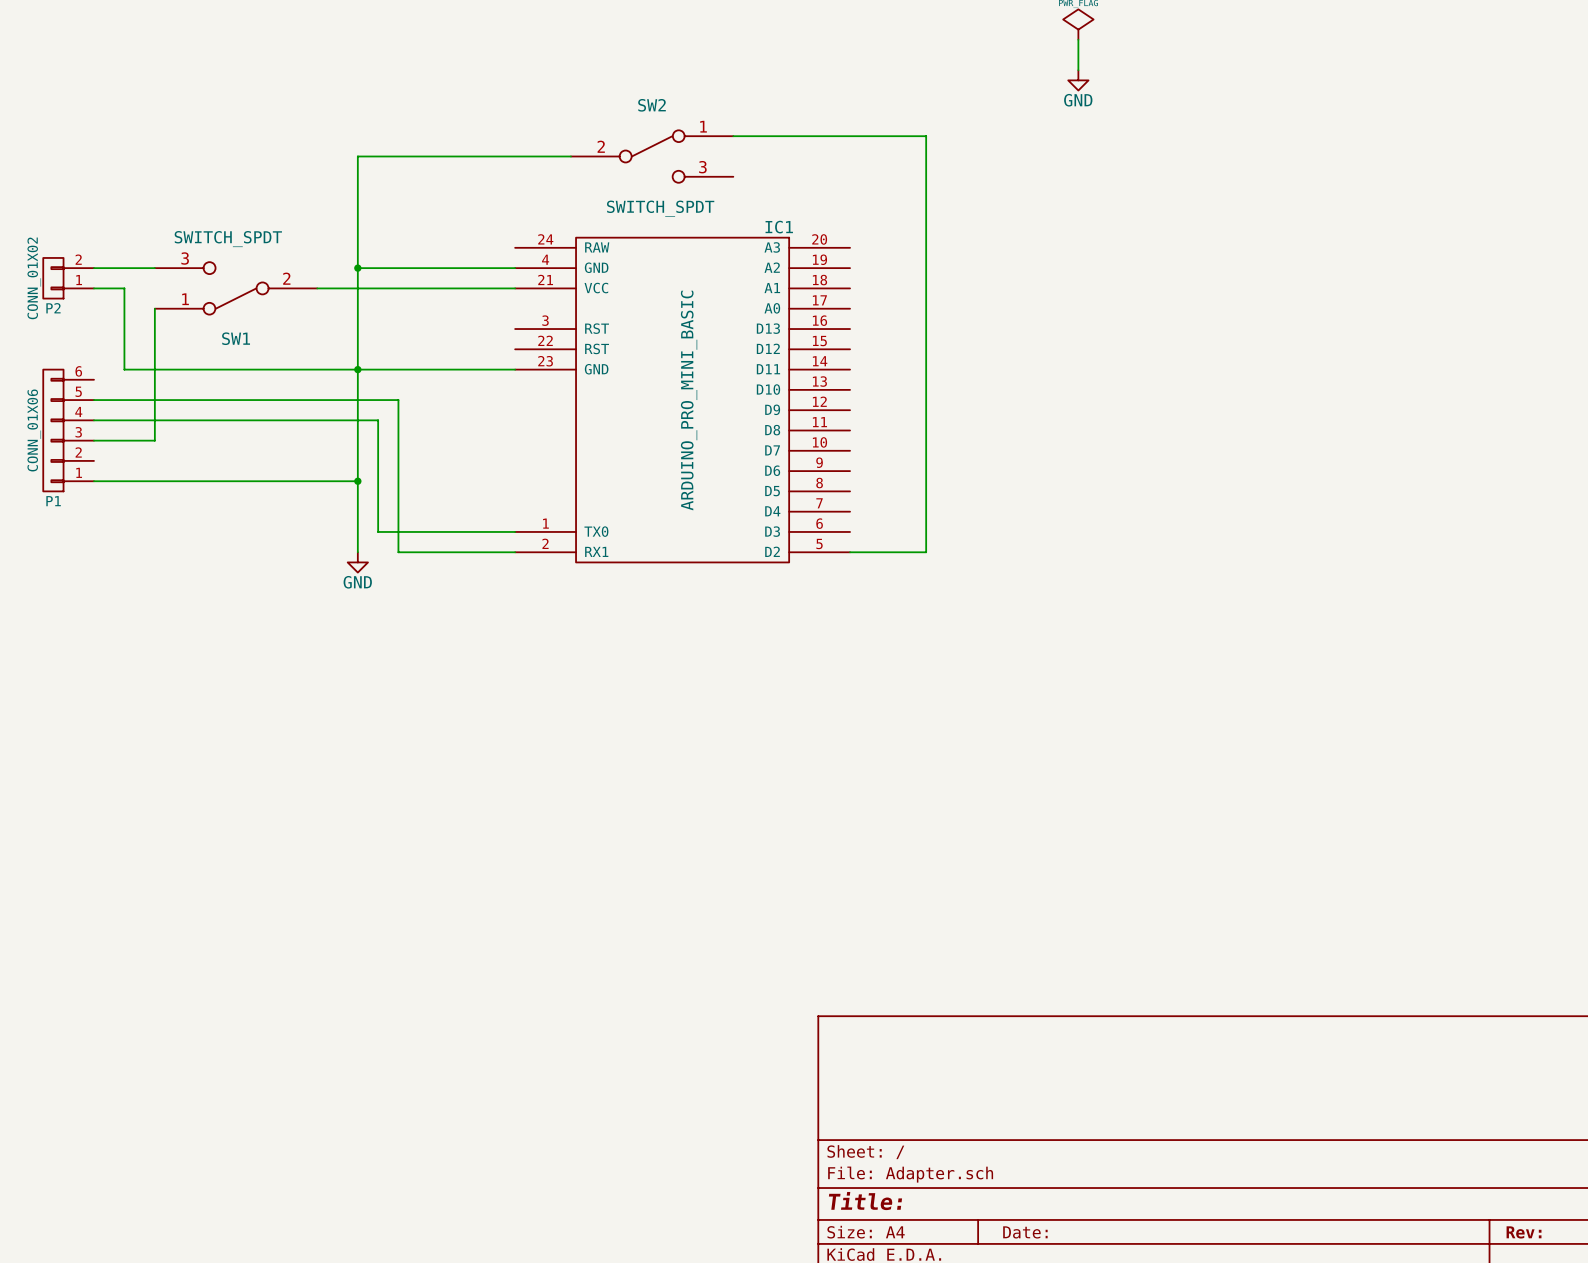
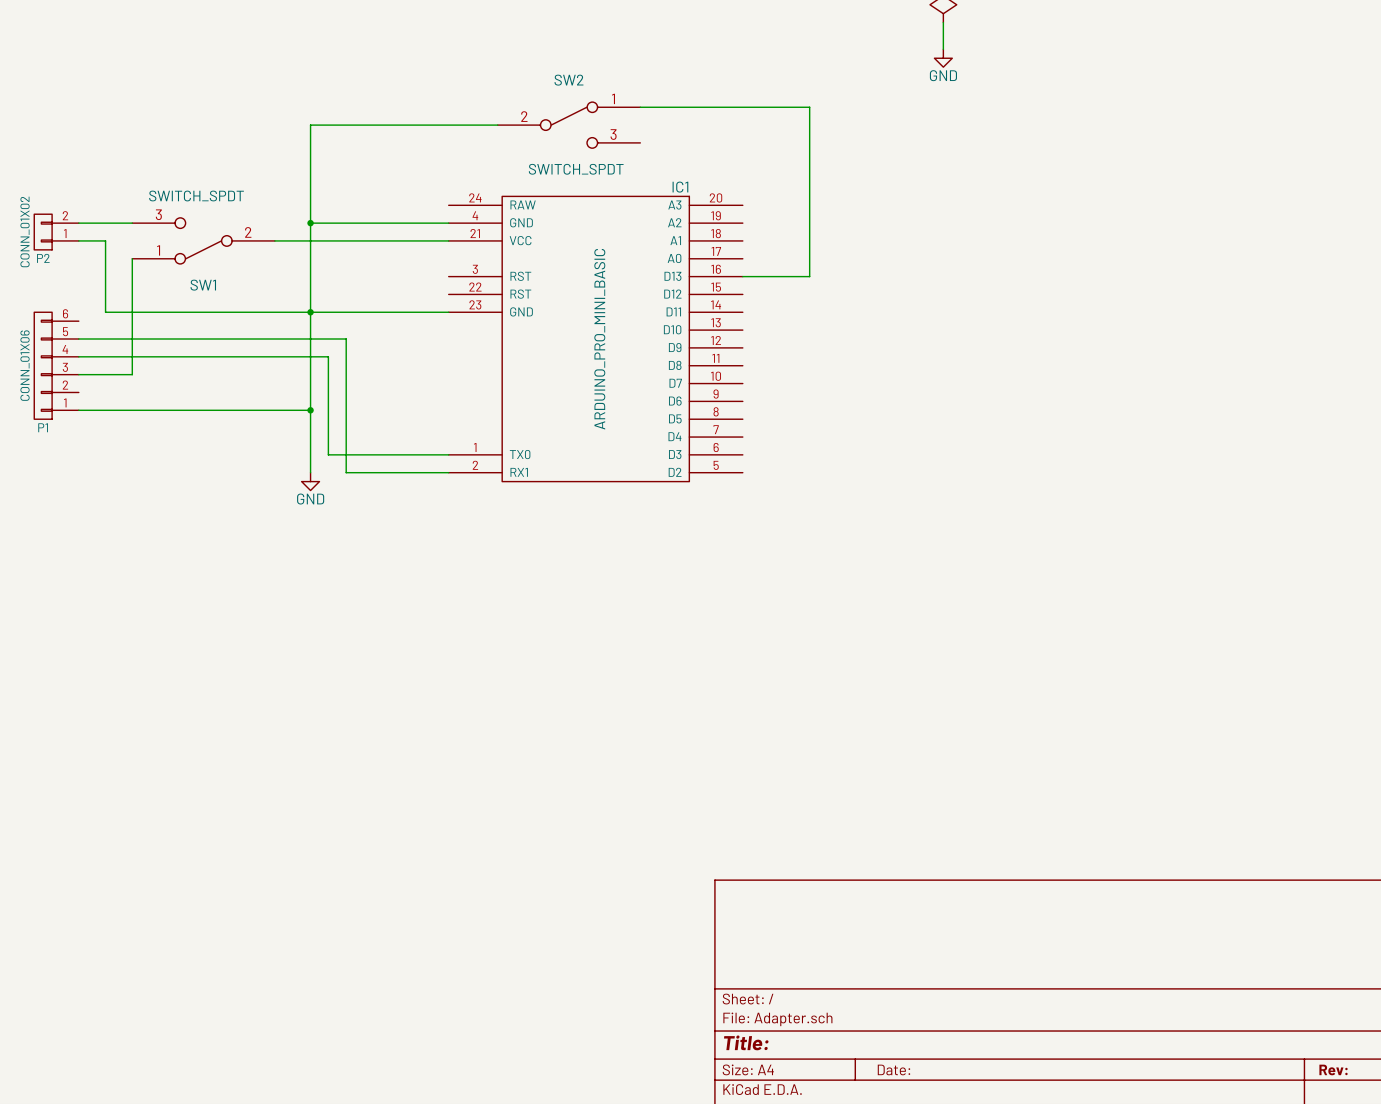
wire: (926, 329) (926, 552) (850, 552) -> (809, 276) (742, 276)

